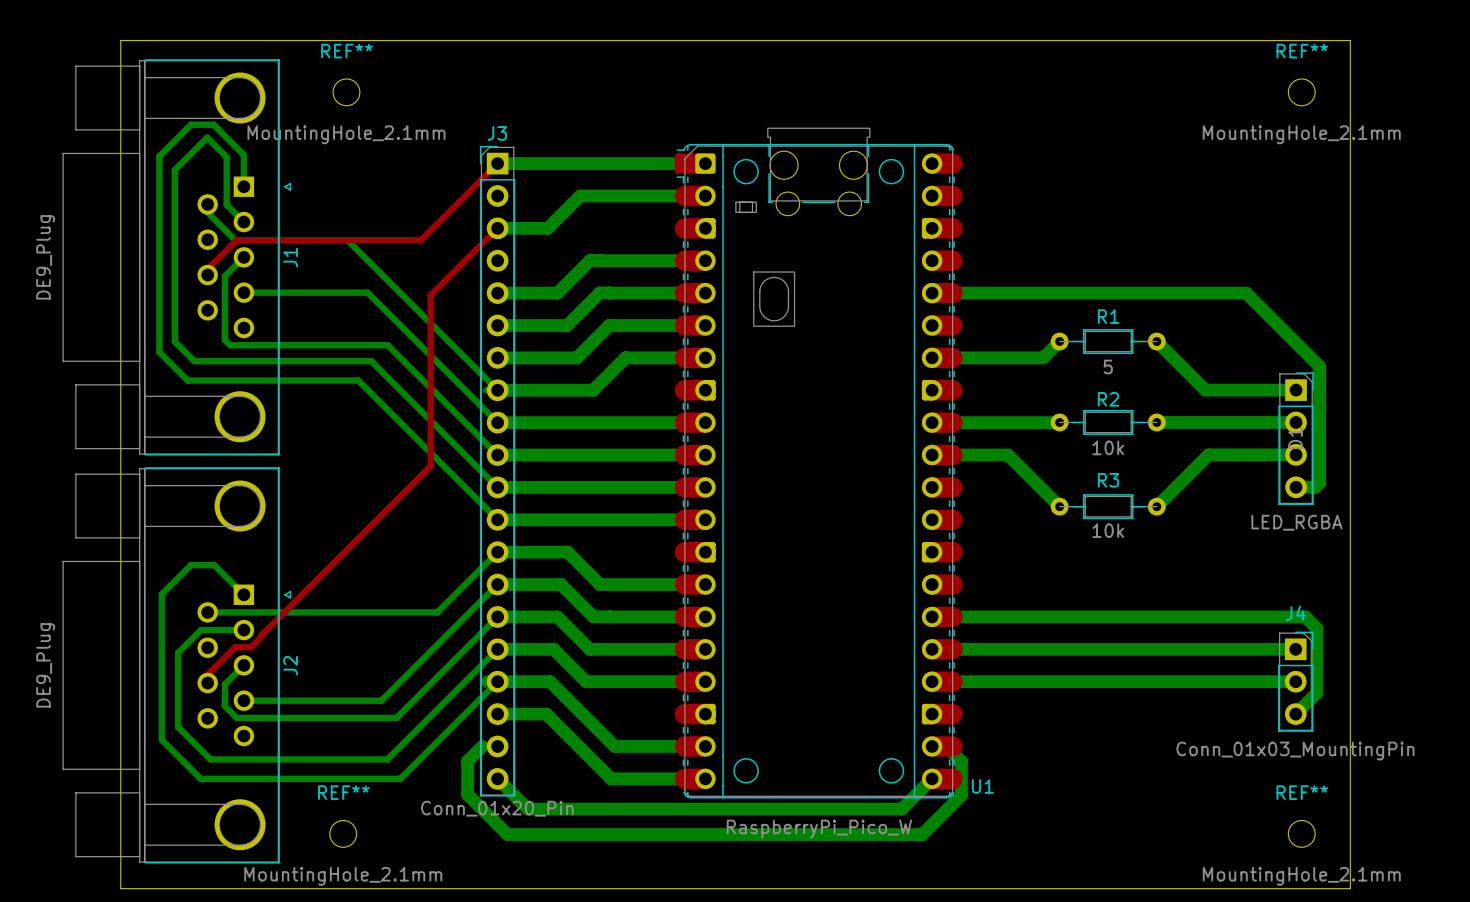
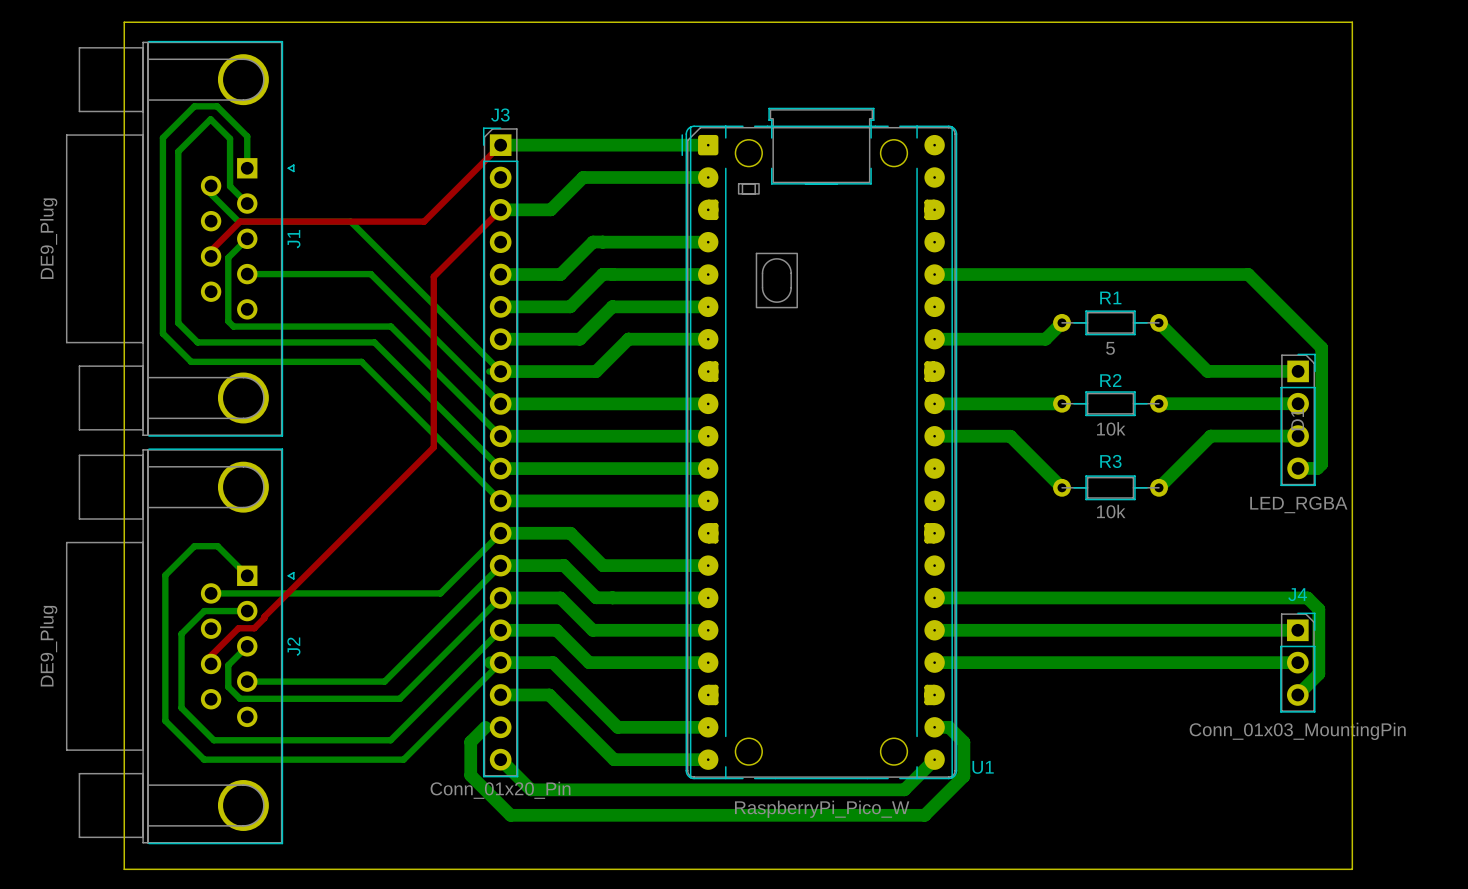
REF**: MountingHole_2.1mm (346, 92) -> none
REF**: MountingHole_2.1mm (1301, 92) -> none
U1 footprint: [674, 127, 963, 799] -> [681, 107, 958, 780]
REF**: MountingHole_2.1mm (343, 833) -> none
REF**: MountingHole_2.1mm (1301, 833) -> none

